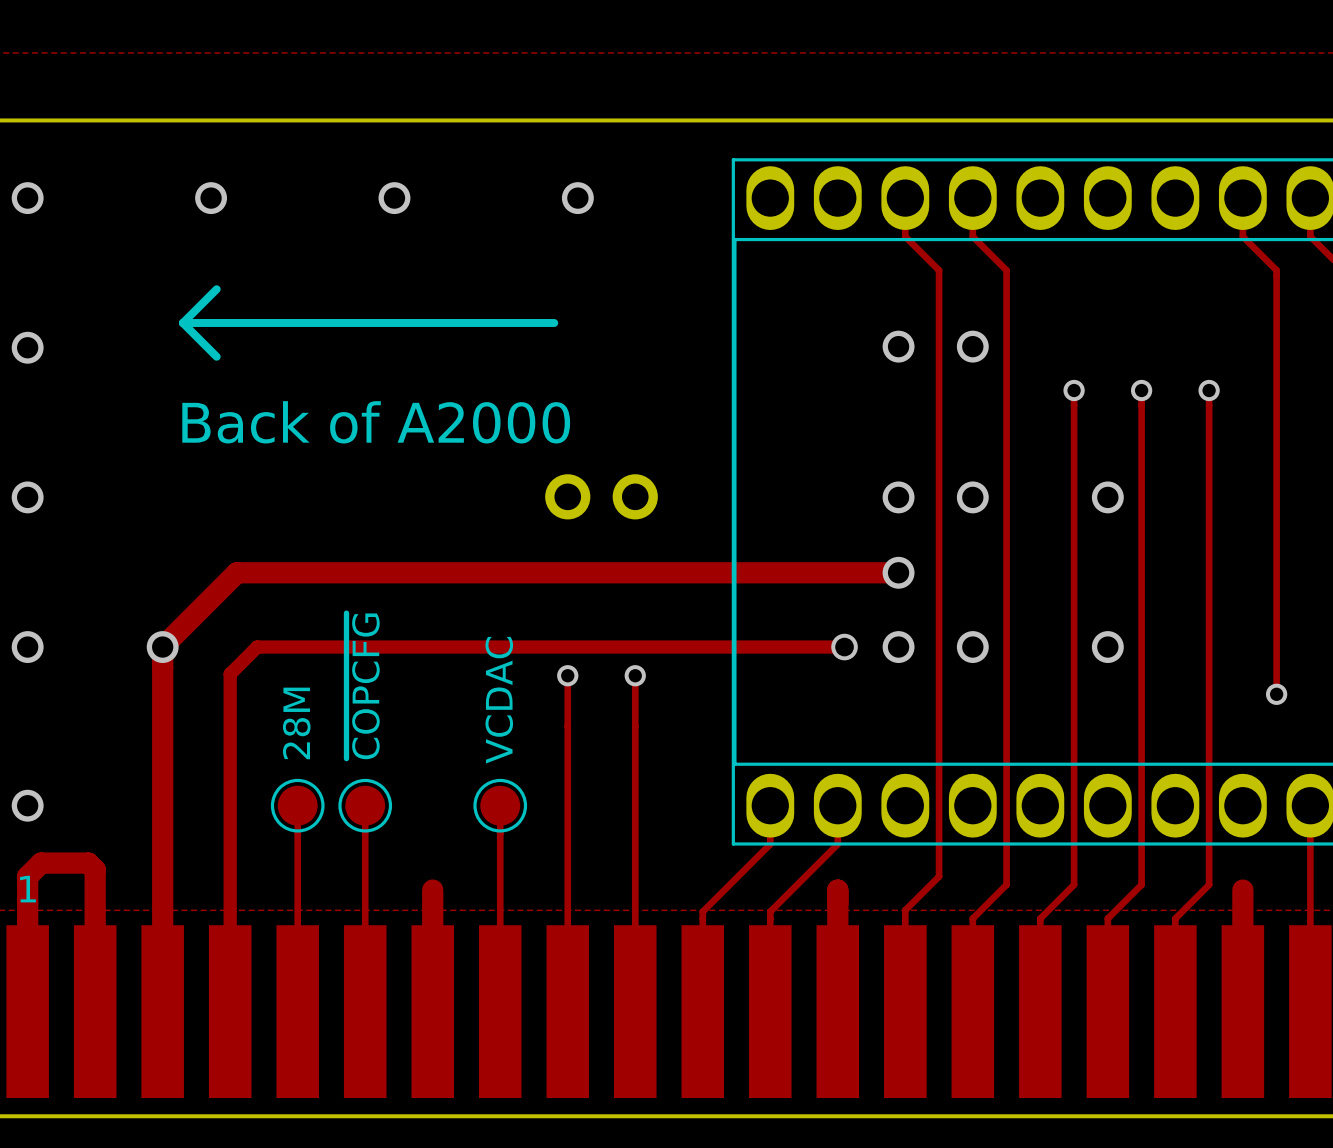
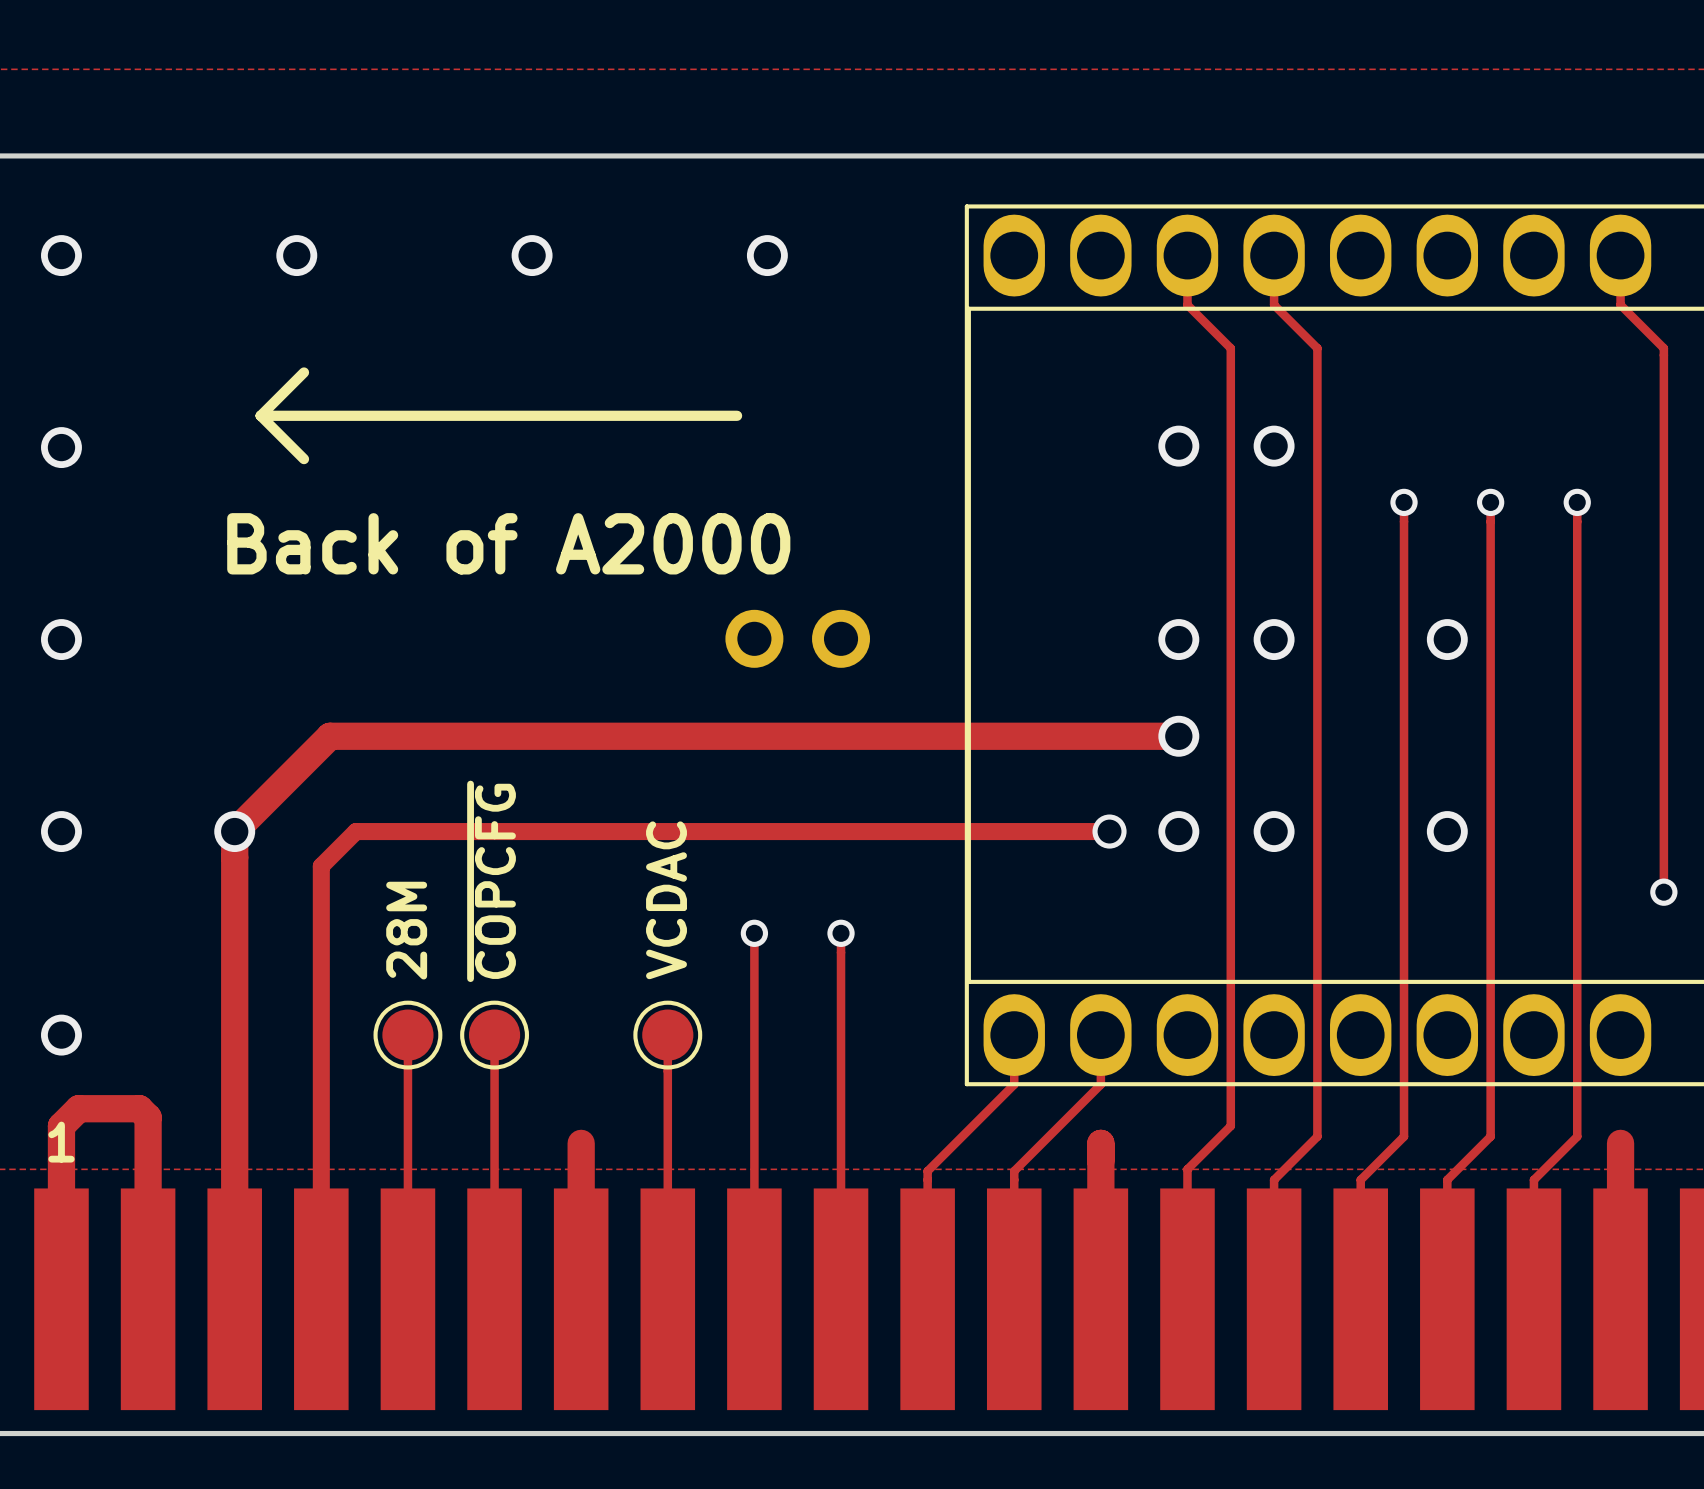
track: (567, 675) (567, 726) -> none
via: (567, 675) -> none
track: (635, 675) (635, 726) -> none
via: (635, 675) -> none
via: none -> (754, 933)
via: none -> (841, 933)

